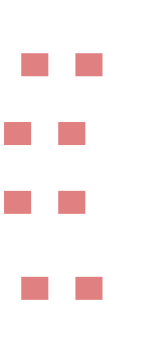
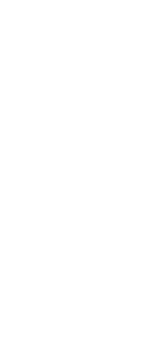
part: (61, 64) -> none
part: (44, 133) -> none
part: (44, 202) -> none
part: (61, 288) -> none

